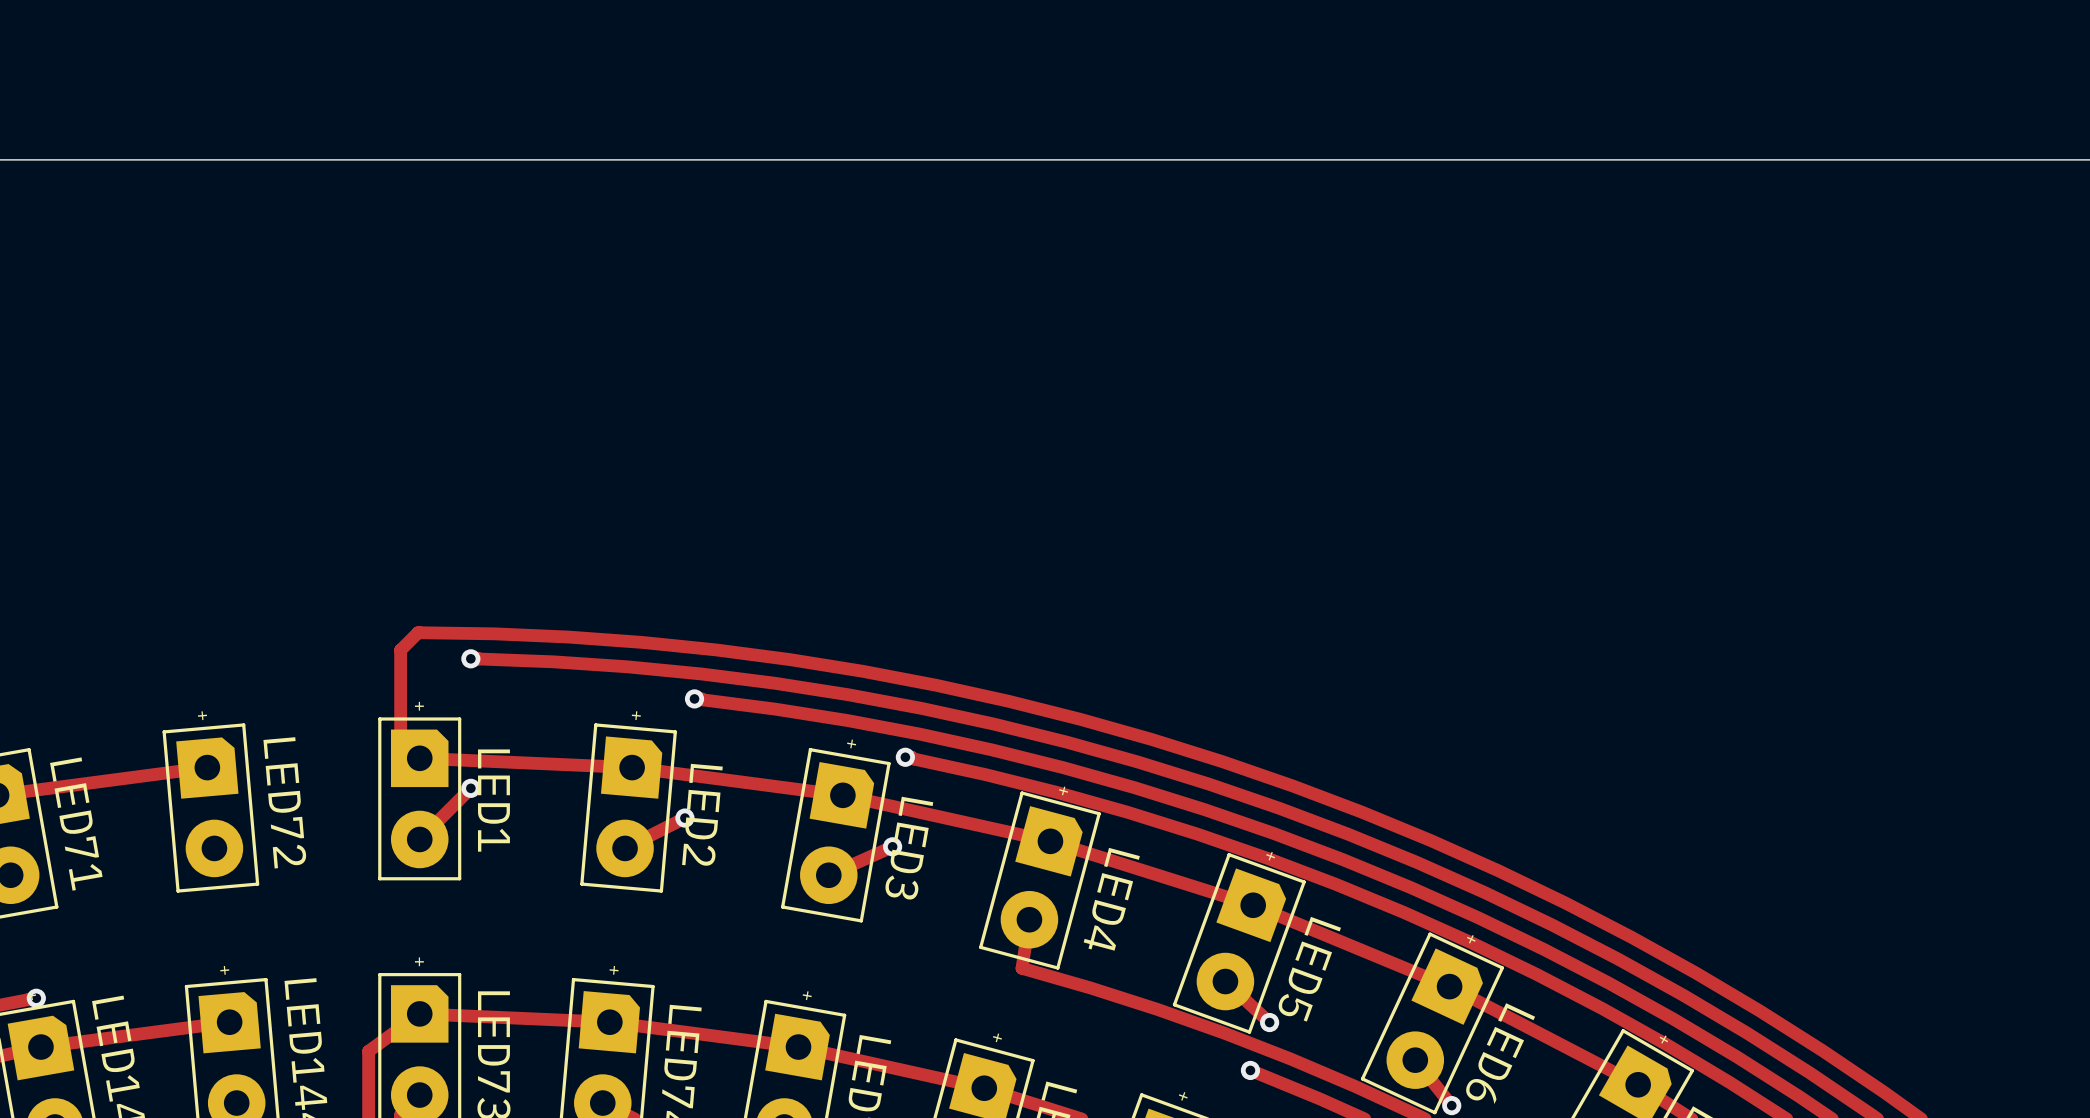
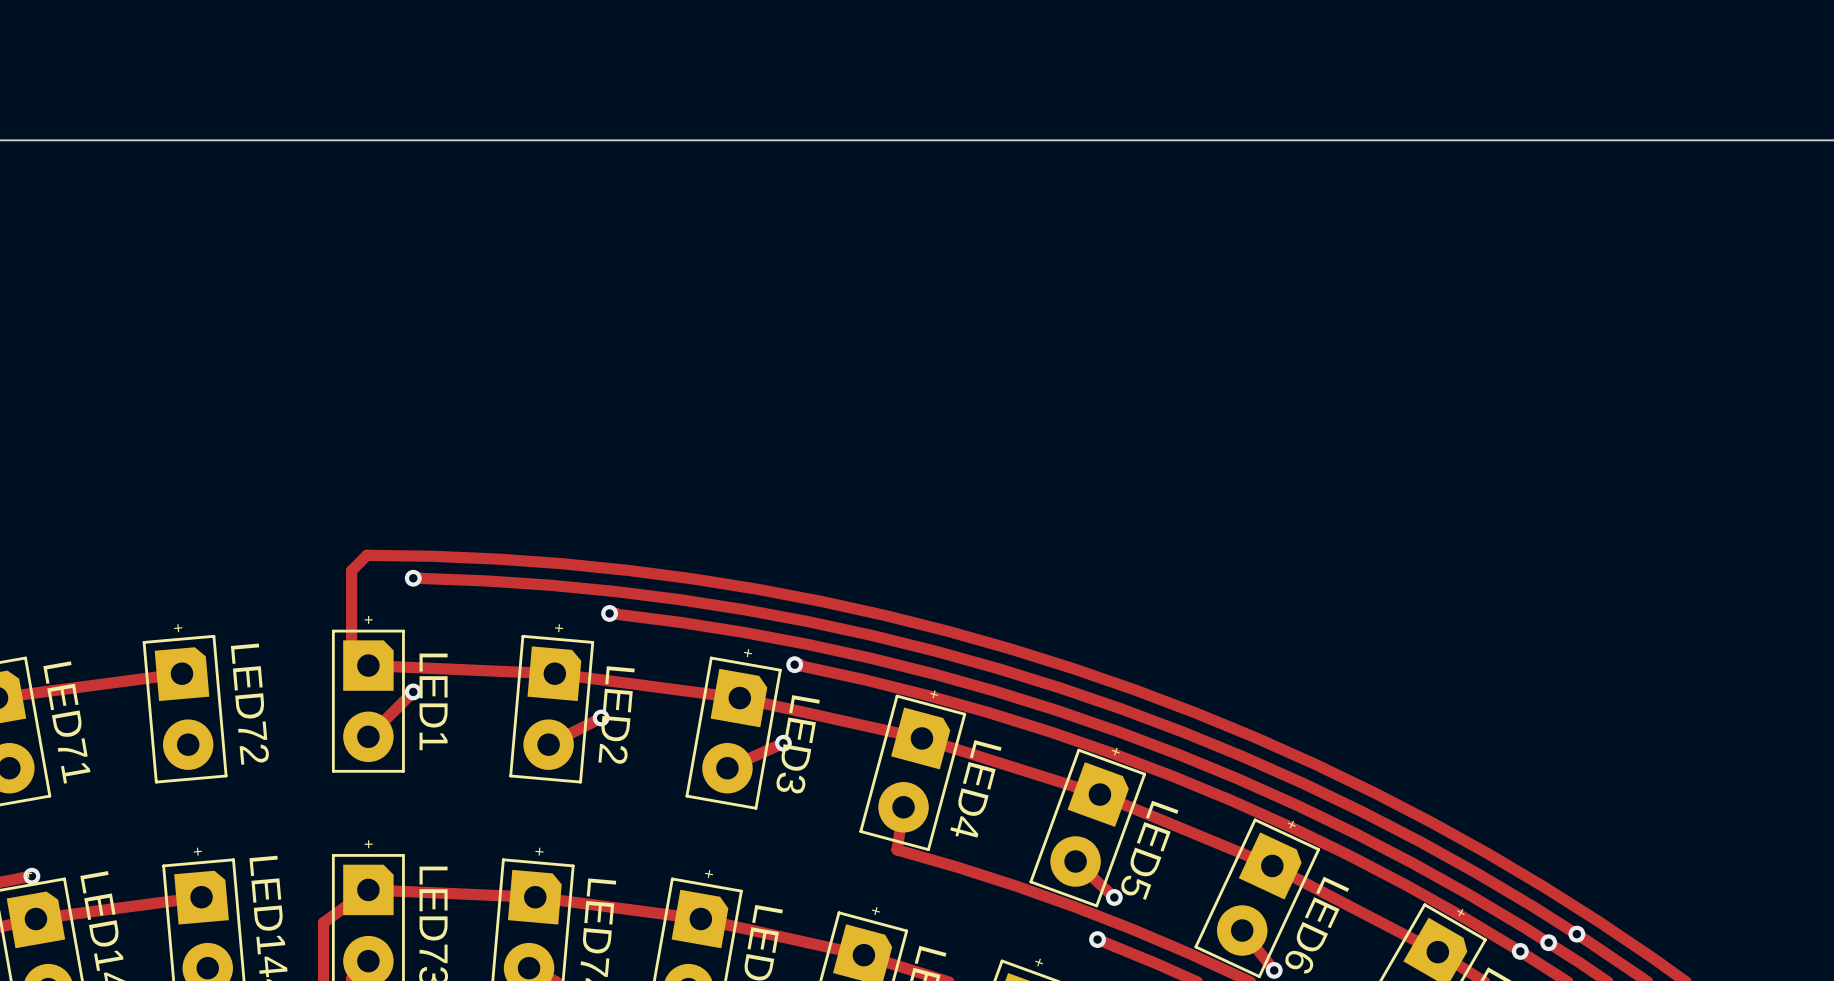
via: none -> (1576, 934)
via: none -> (1548, 942)
via: none -> (1520, 951)

